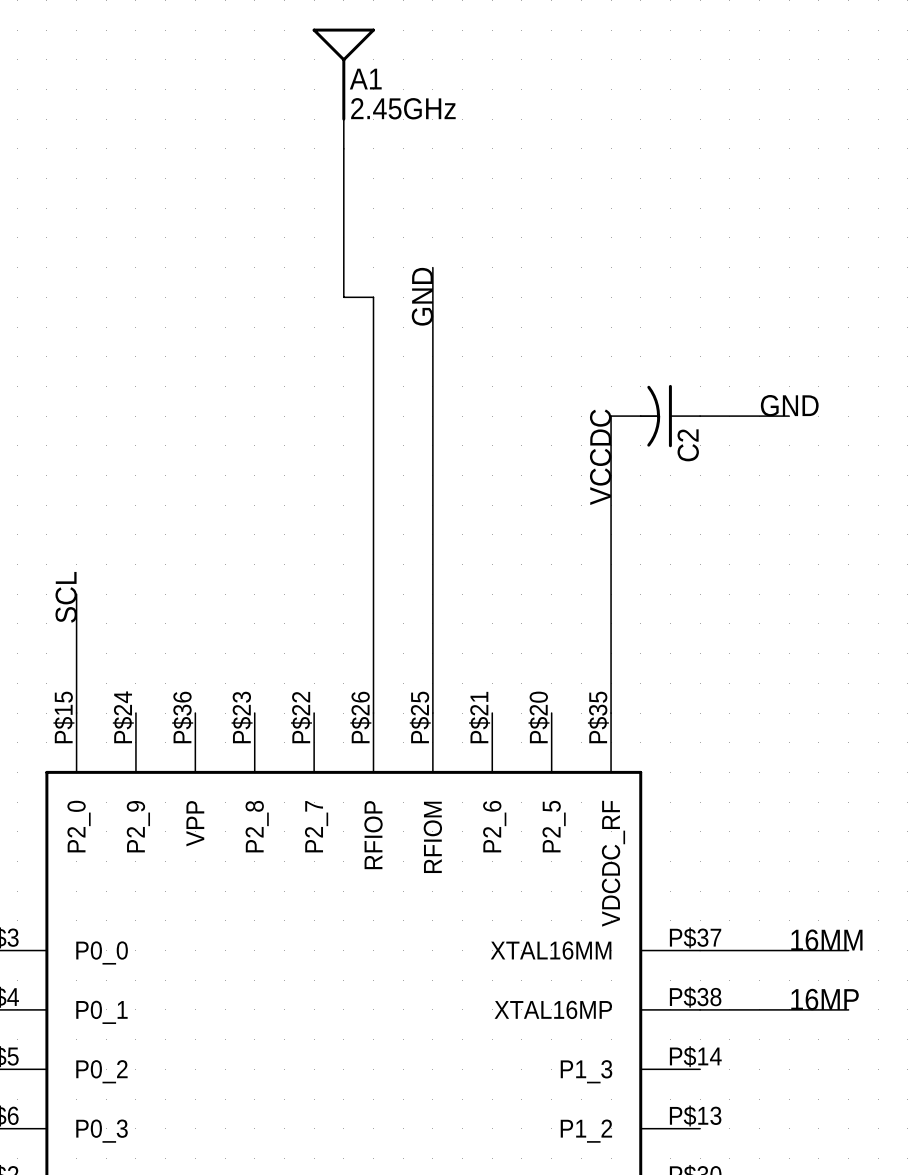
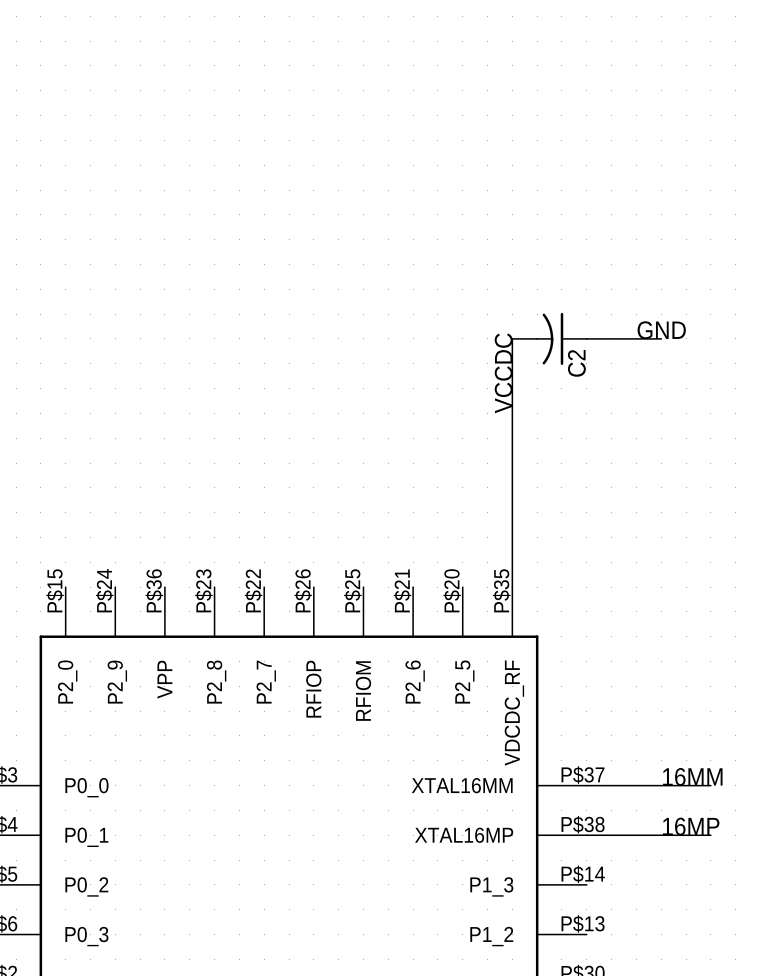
A1: 2.45GHz (343, 88) -> none
wire: (343, 148) (343, 297) (373, 297) (373, 713) -> none
wire: (432, 267) (432, 713) -> none
label: GND (422, 296) -> none
wire: (76, 594) (76, 713) -> none
label: SCL (66, 597) -> none

